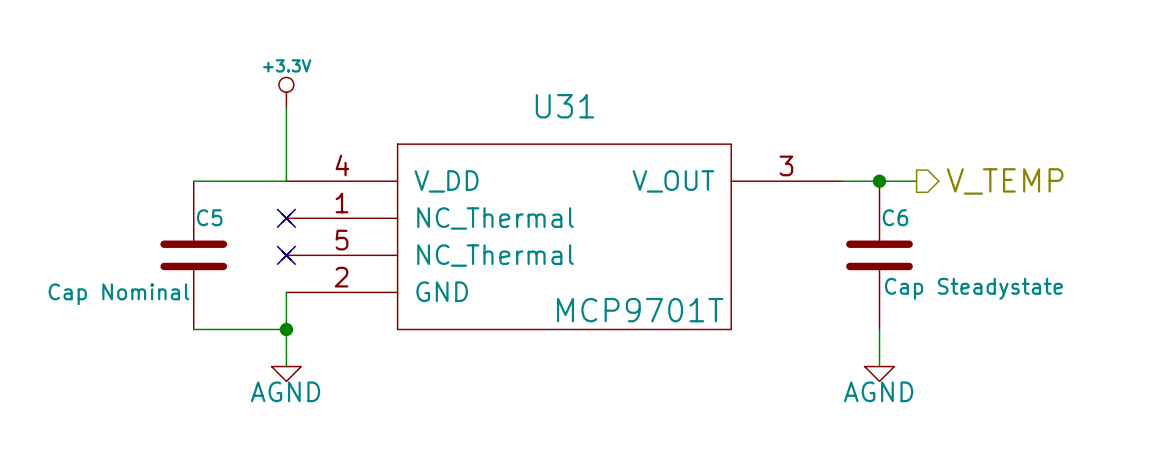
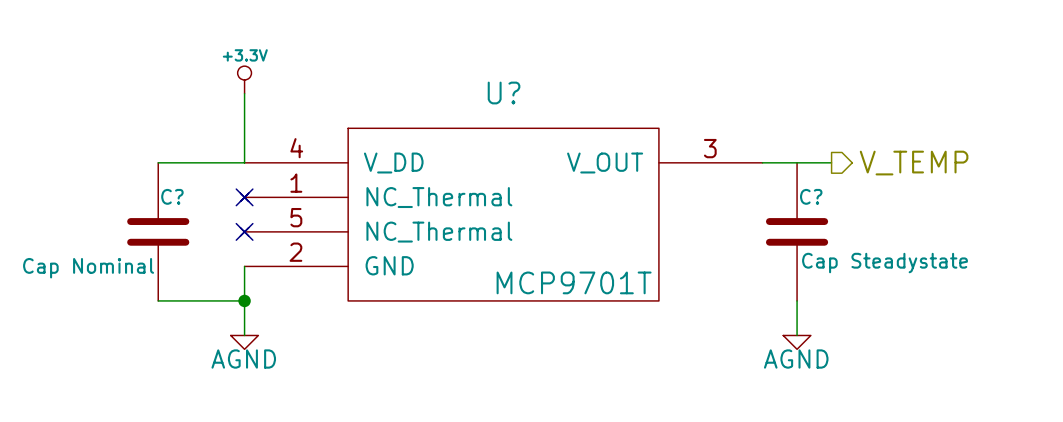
U31 name: U31 (564, 106) -> U? (504, 93)
junction: (879, 181) -> none
C5 name: C5 (209, 217) -> C? (172, 196)
C6 name: C6 (895, 217) -> C? (811, 196)

